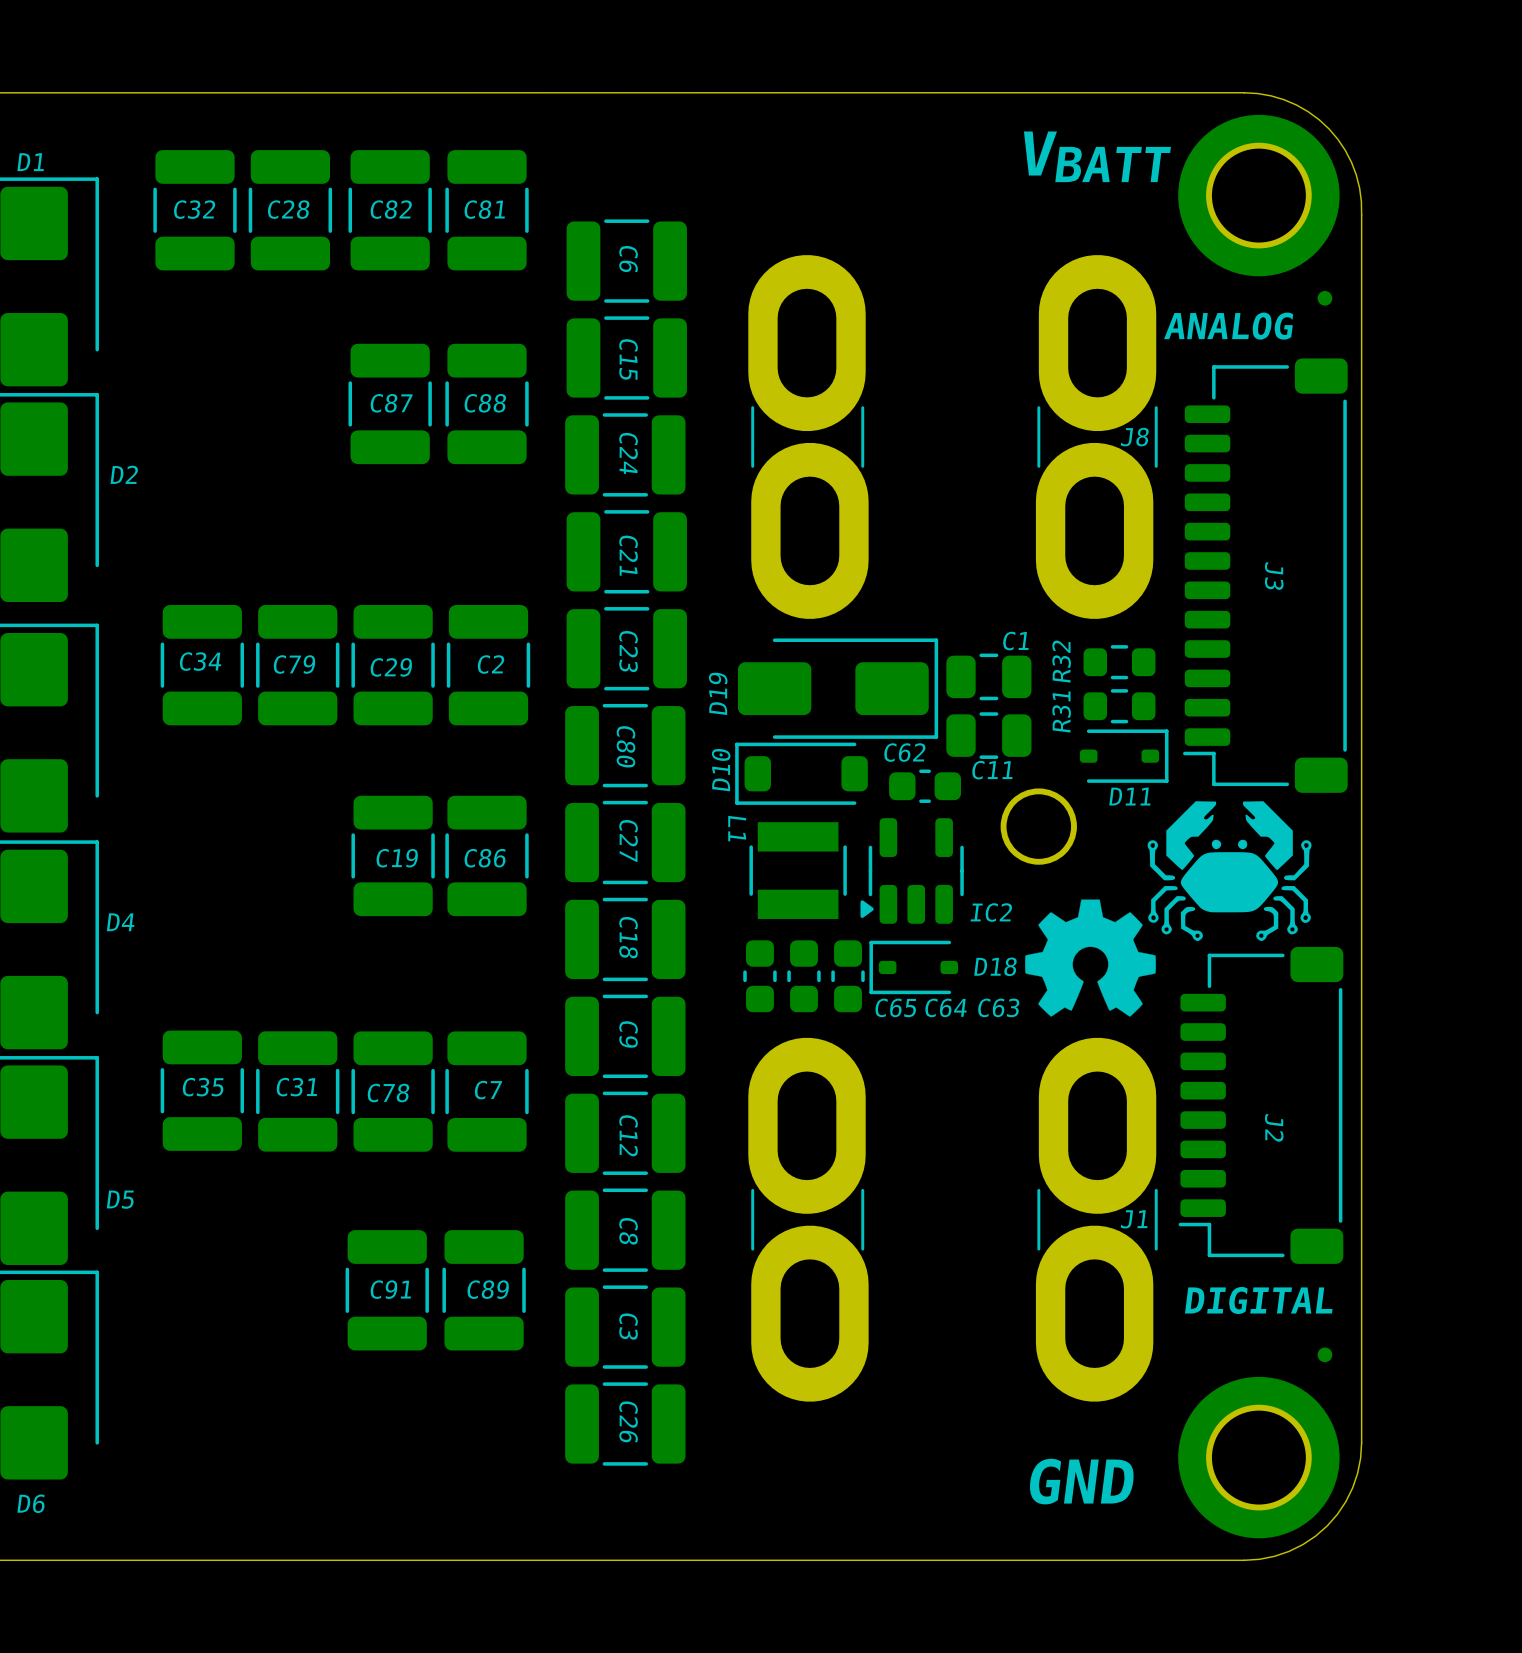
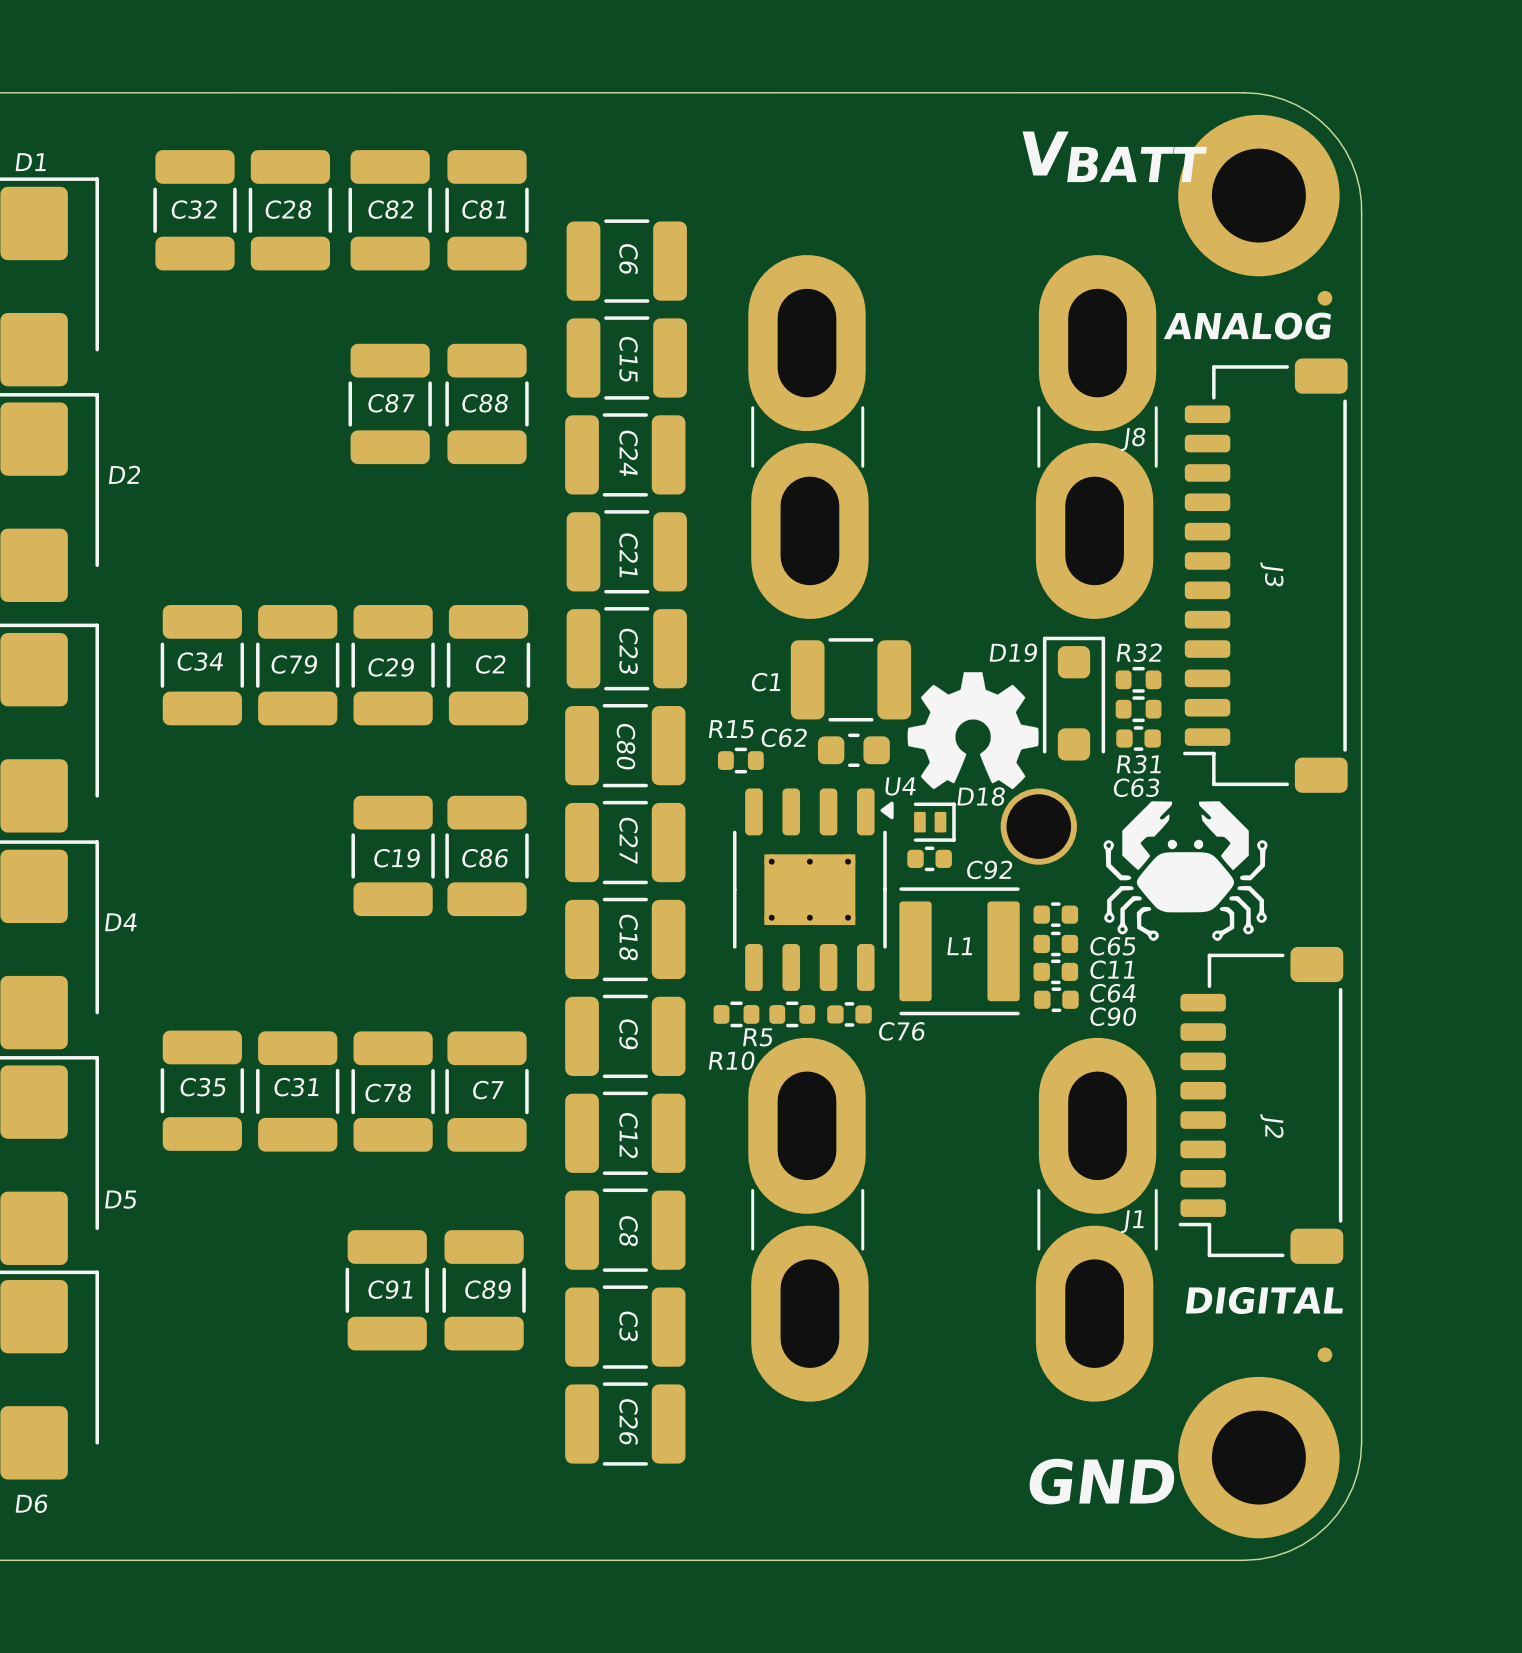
D19 footprint: [737, 638, 939, 739] -> [1042, 636, 1106, 761]
C1 name position: C1 (1015, 641) -> C1 (765, 682)
R32 footprint: [1083, 645, 1156, 680] -> [1115, 666, 1162, 693]
C1 footprint: [946, 653, 1032, 701] -> [790, 638, 912, 722]
R32 name position: R32 (1061, 661) -> R32 (1139, 652)
R31 footprint: [1083, 689, 1156, 724] -> [1115, 696, 1162, 723]
D19 name position: D19 (718, 693) -> D19 (1013, 652)
R31 name position: R31 (1061, 711) -> R31 (1138, 764)
C11 footprint: [946, 712, 1032, 759] -> [1033, 931, 1079, 957]
C62 name position: C62 (904, 752) -> C62 (784, 737)
D11: (1124, 756) -> none
R15: none -> (740, 760)
D10: (801, 773) -> none
C62 position: (925, 786) -> (853, 750)
L1 footprint: [749, 822, 847, 920] -> [899, 887, 1020, 1016]
L1 name position: L1 (737, 828) -> L1 (959, 946)
C92: none -> (929, 858)
IC2: (912, 870) -> none
drawing position: (1229, 871) -> (1185, 871)
U4: none -> (813, 889)
C65 footprint: [743, 940, 777, 1013] -> [1033, 902, 1079, 927]
C64 footprint: [787, 940, 821, 1013] -> [1033, 959, 1079, 985]
C63 footprint: [831, 940, 865, 1013] -> [1116, 726, 1161, 751]
D18 footprint: [869, 940, 959, 995] -> [913, 802, 956, 842]
drawing position: (1090, 958) -> (973, 730)
C90: none -> (1056, 999)
C65 name position: C65 (895, 1007) -> C65 (1112, 946)
C64 name position: C64 (945, 1007) -> C64 (1112, 993)
C63 name position: C63 (998, 1007) -> C63 (1136, 787)
R10: none -> (736, 1014)
R5: none -> (792, 1014)
C76: none -> (849, 1014)

